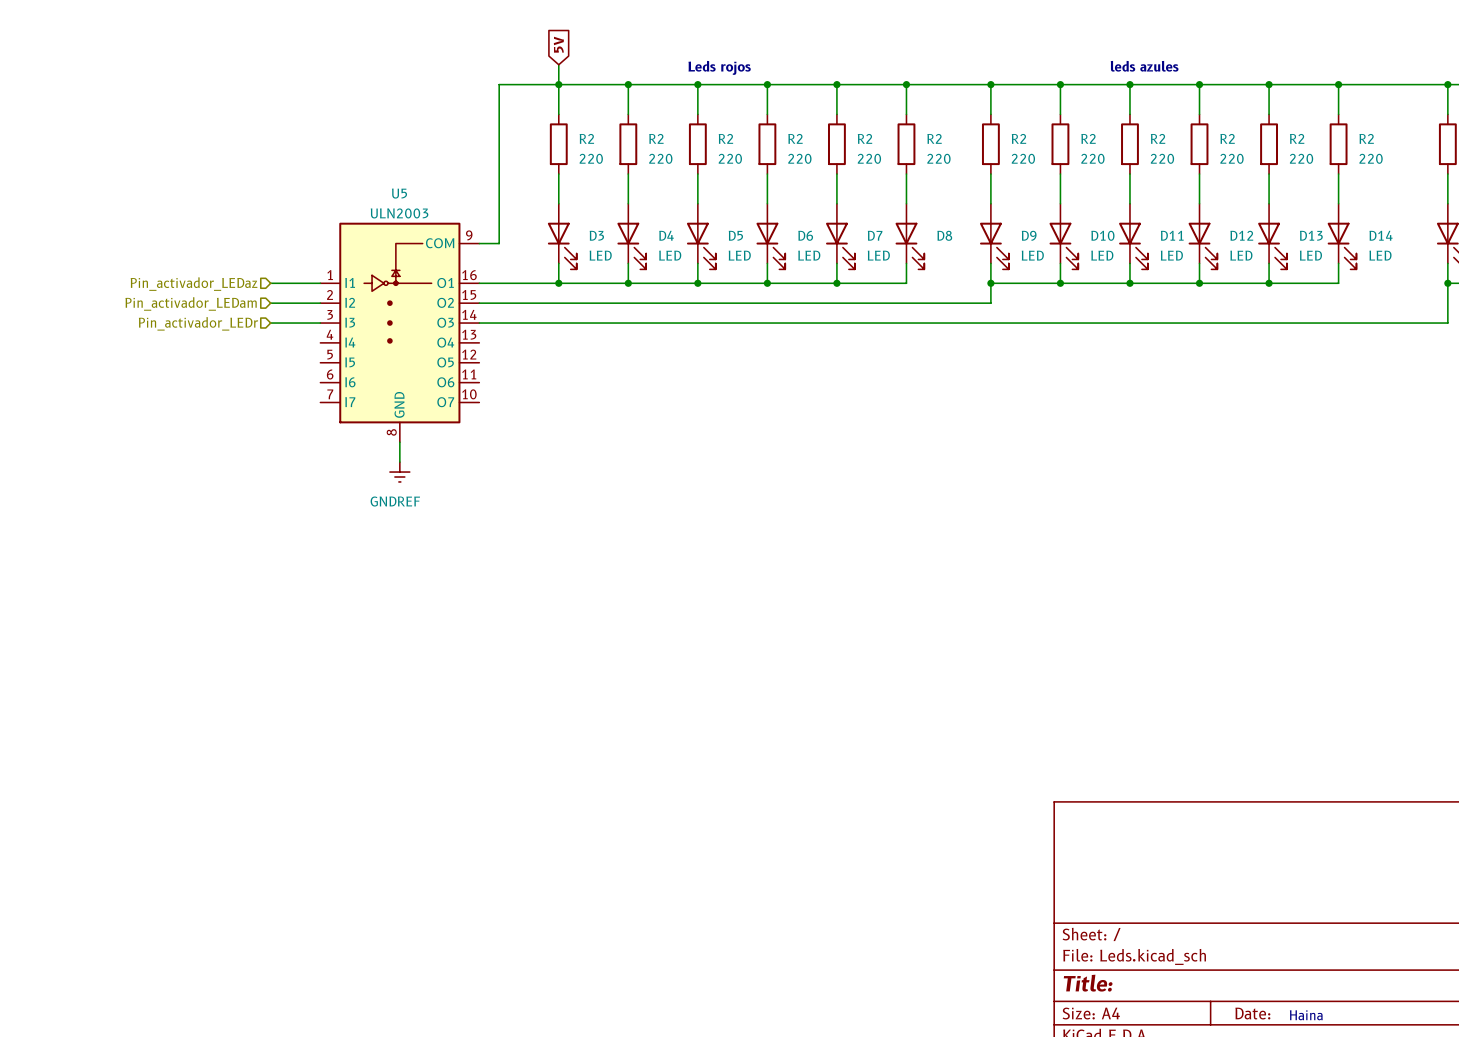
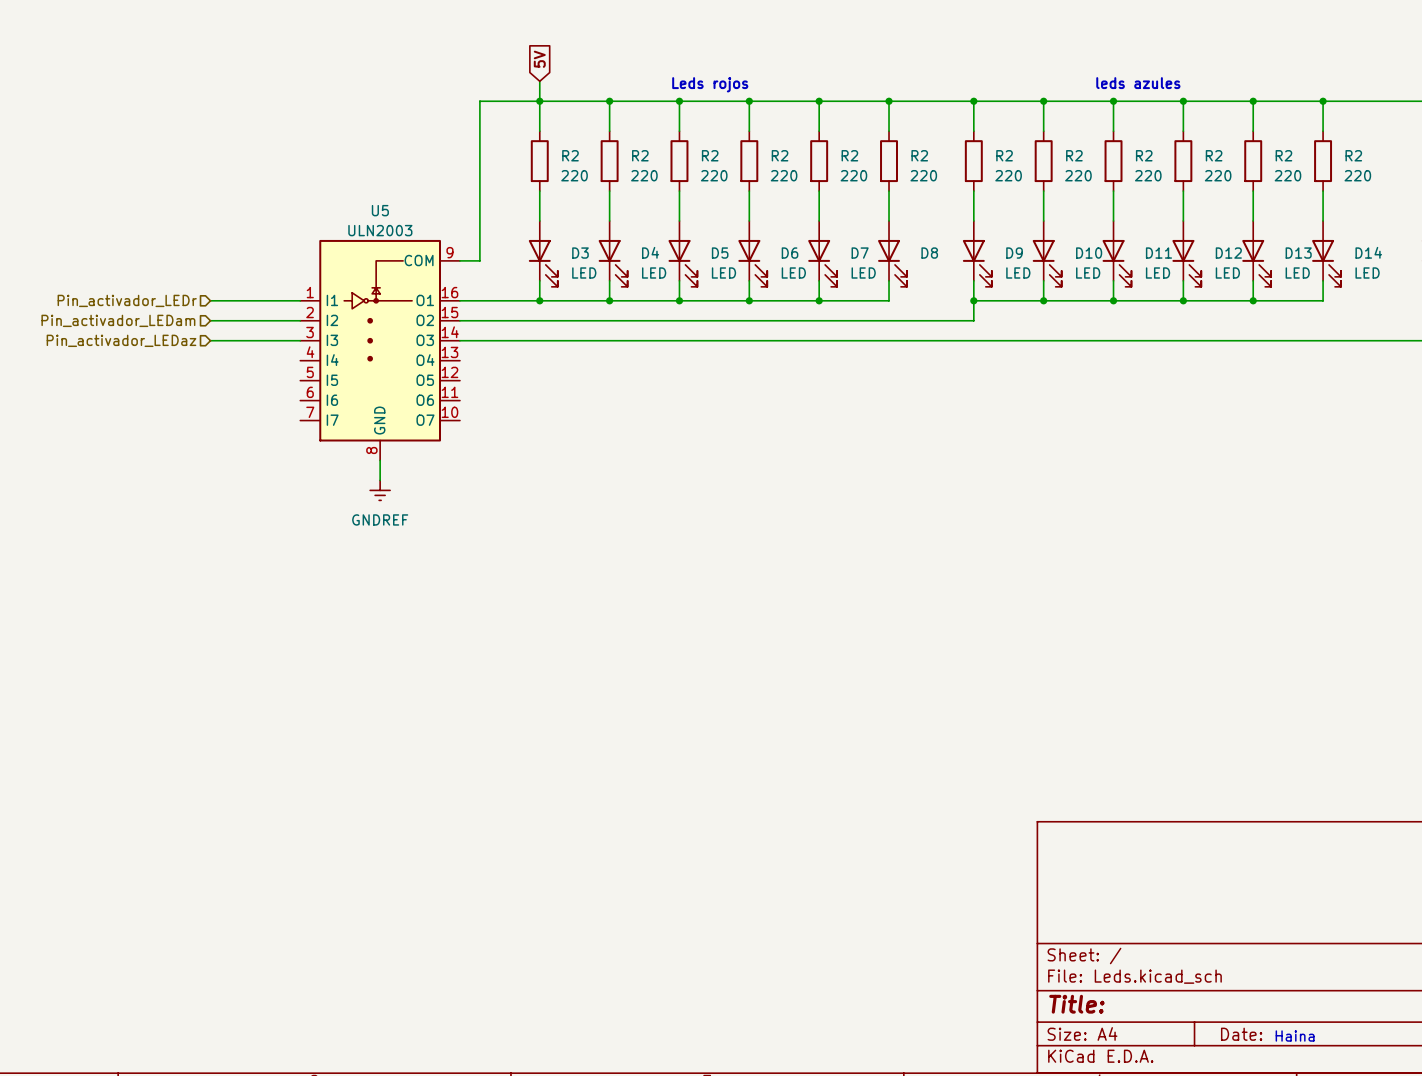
wire: none -> (210, 300) (250, 300)
hierarchical label position: Pin_activador_LEDaz (194, 284) -> Pin_activador_LEDaz (121, 340)
hierarchical label position: Pin_activador_LEDam (191, 303) -> Pin_activador_LEDam (118, 320)
wire: none -> (210, 320) (250, 320)
hierarchical label position: Pin_activador_LEDr (198, 323) -> Pin_activador_LEDr (127, 300)
wire: none -> (210, 340) (250, 340)

